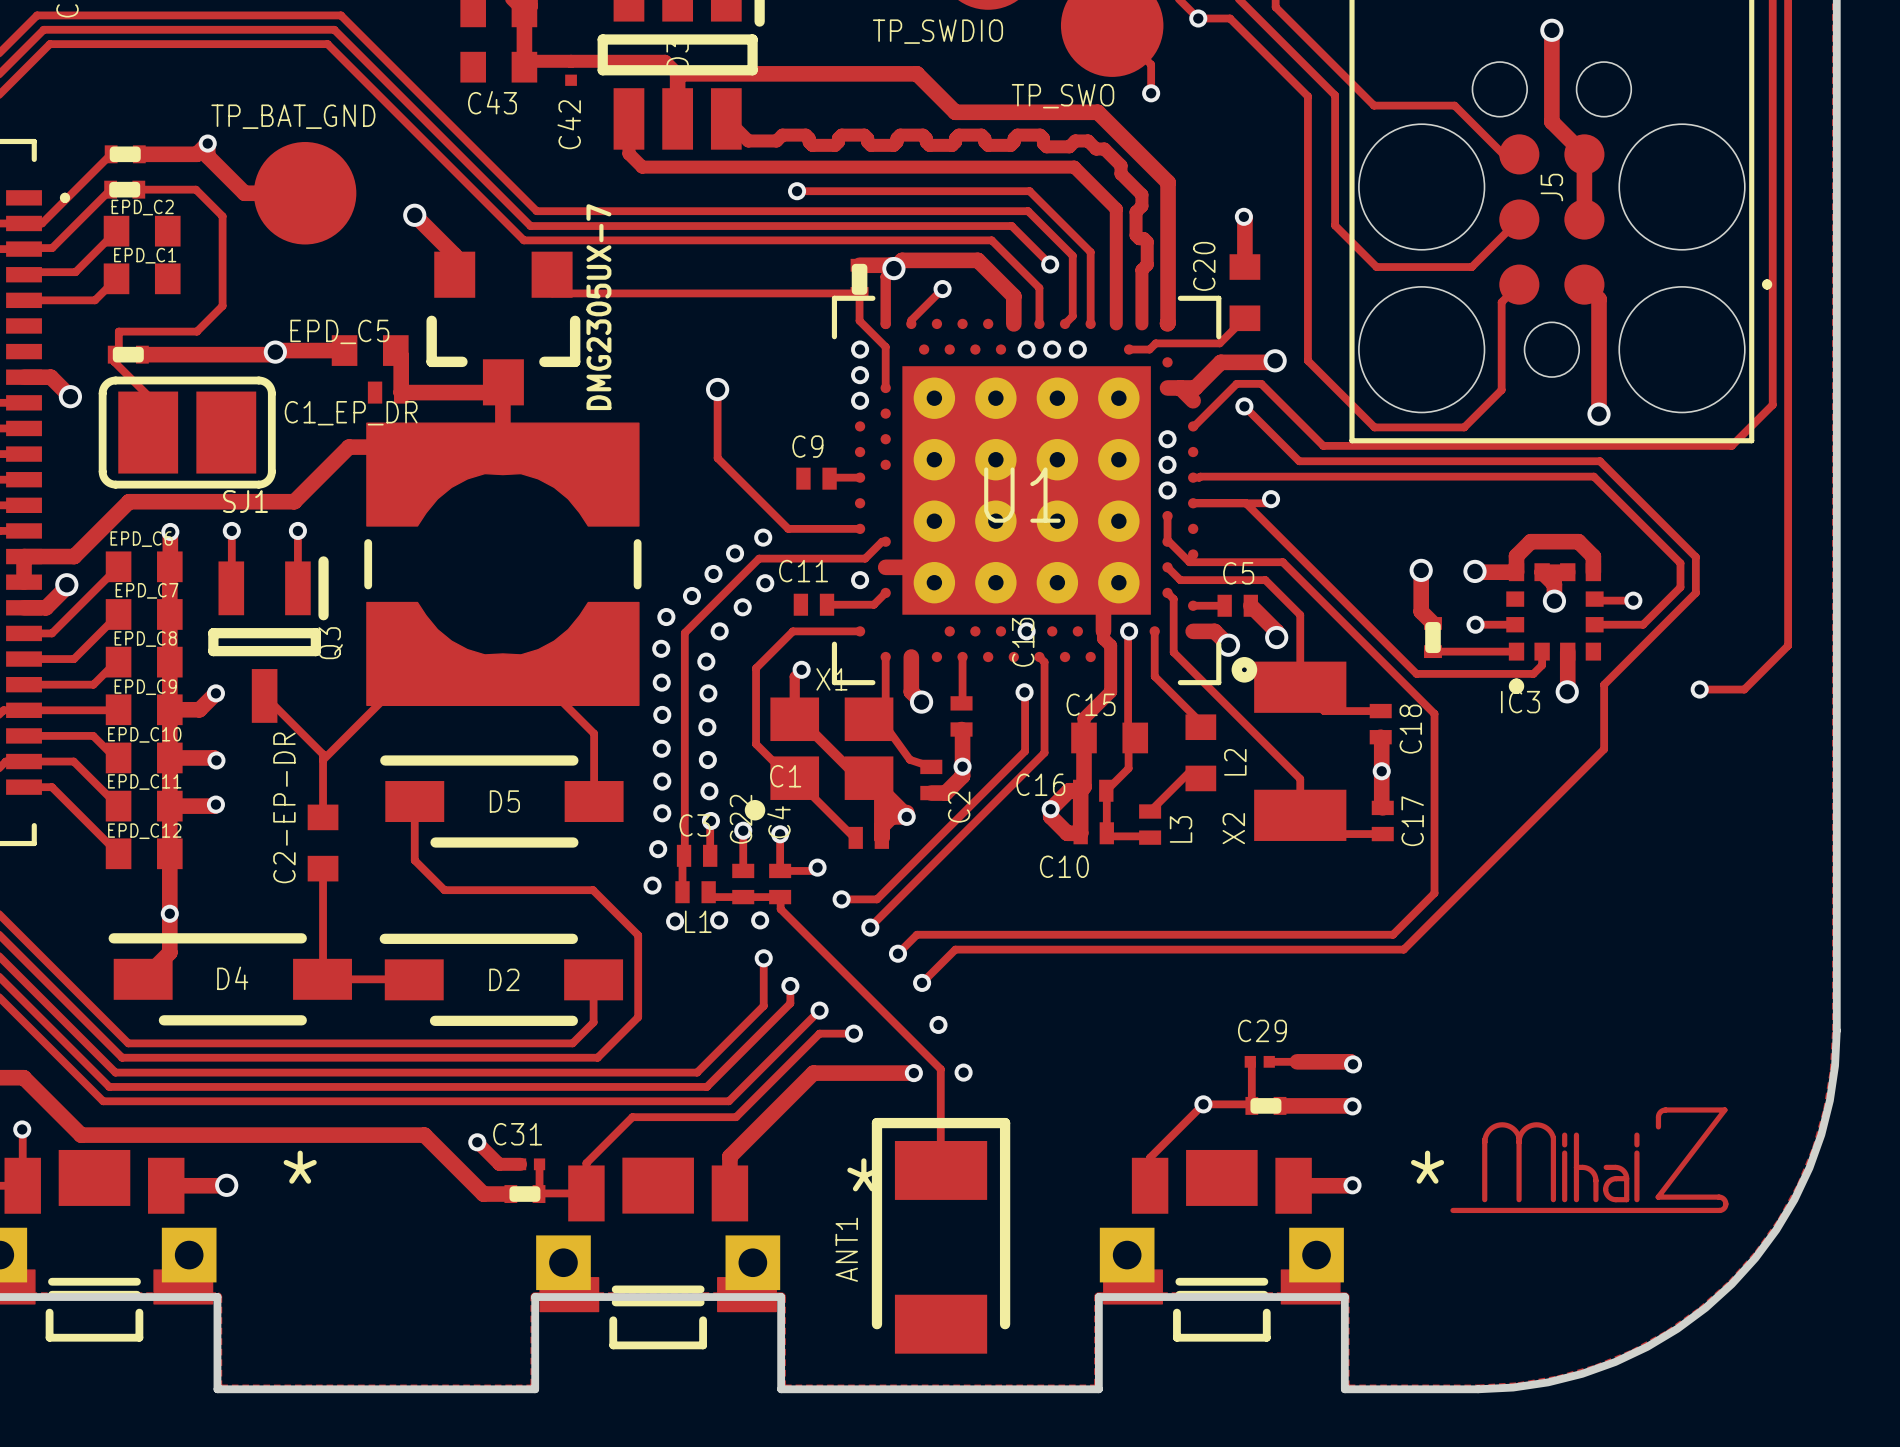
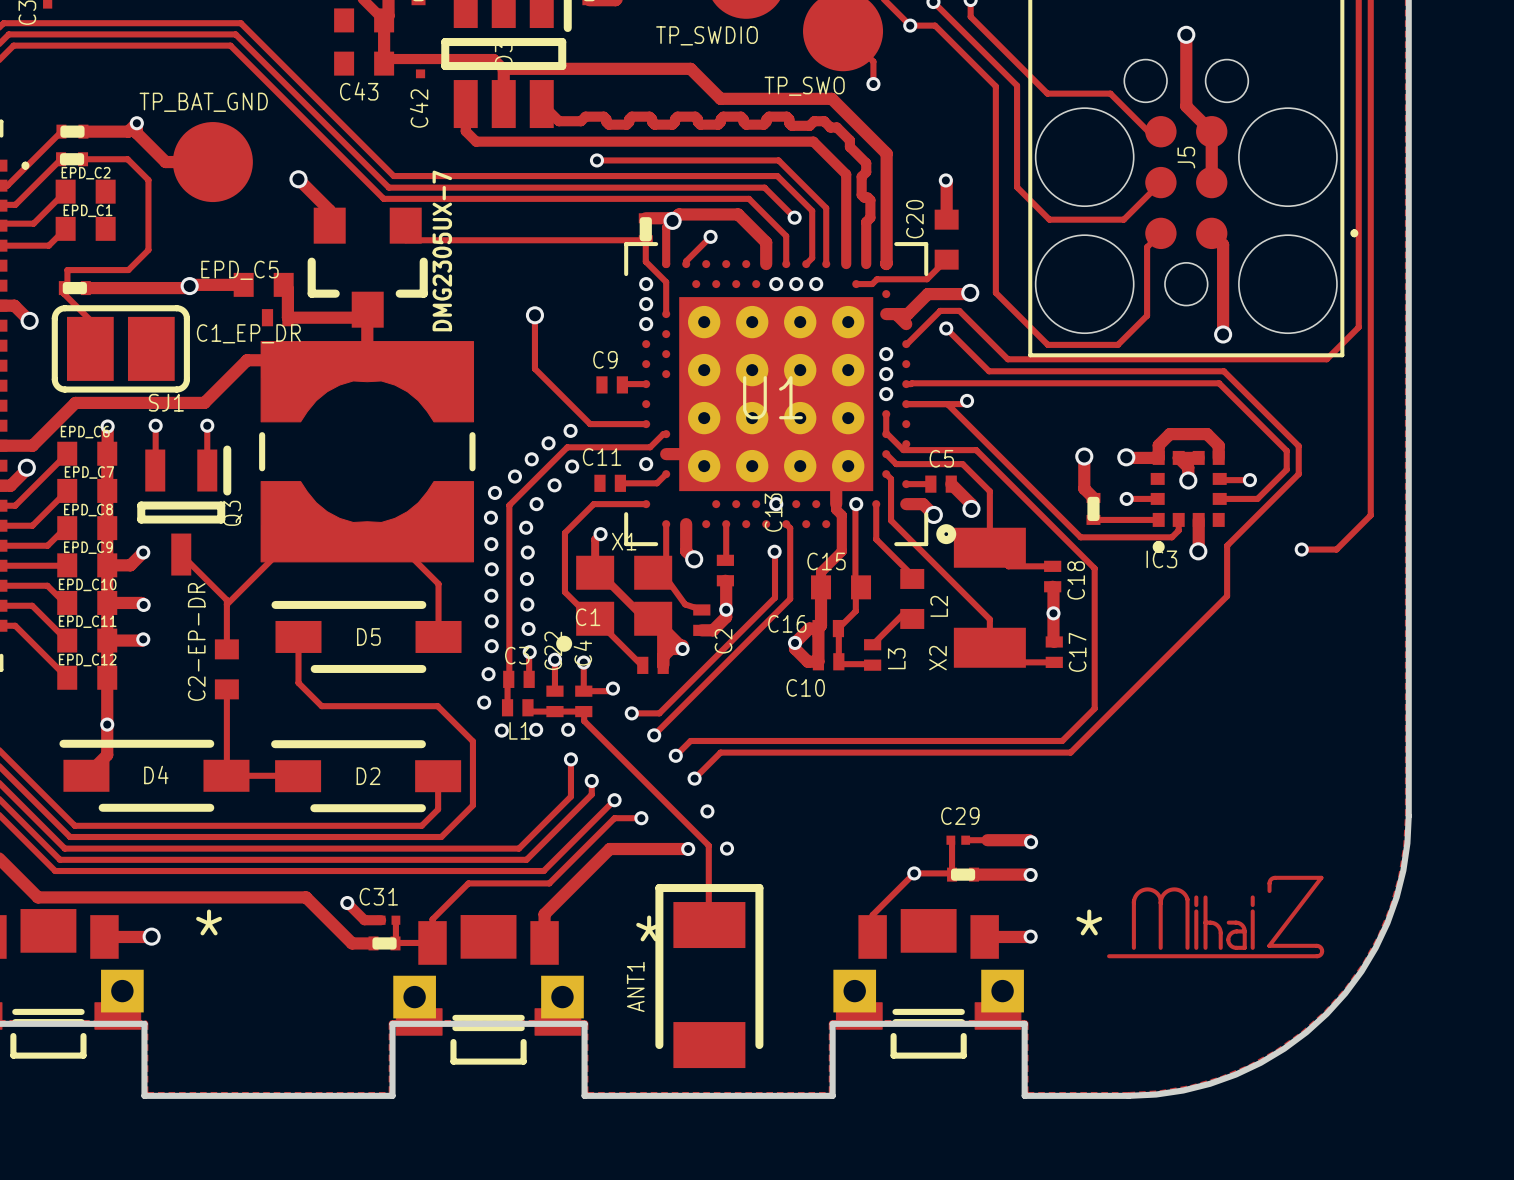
track: (940, 1069) (940, 1170) -> (708, 845) (708, 936) (696, 925)

